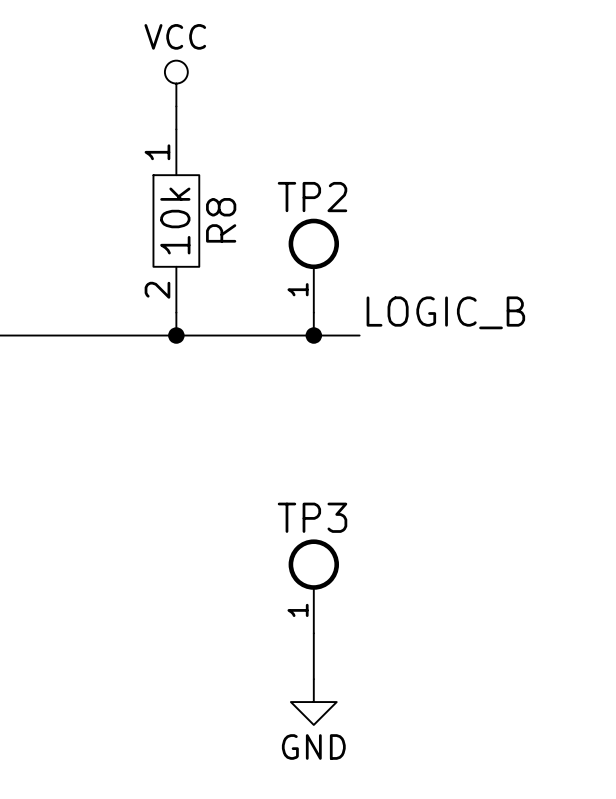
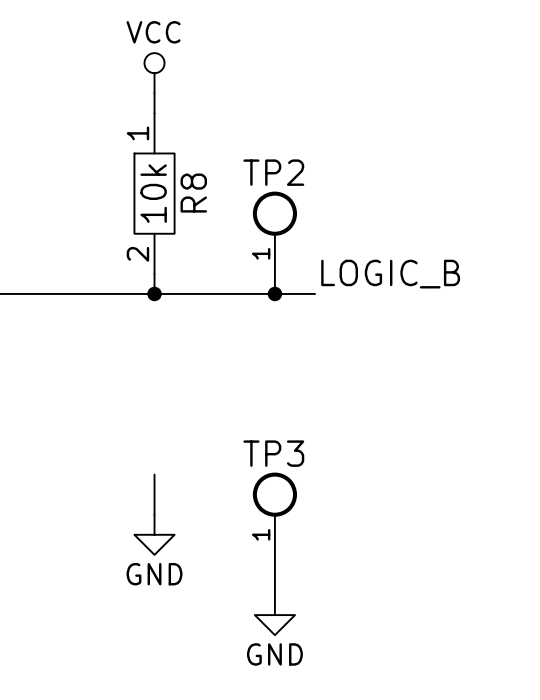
wire: none -> (154, 474) (154, 514)
power symbol: none -> GND (154, 534)

